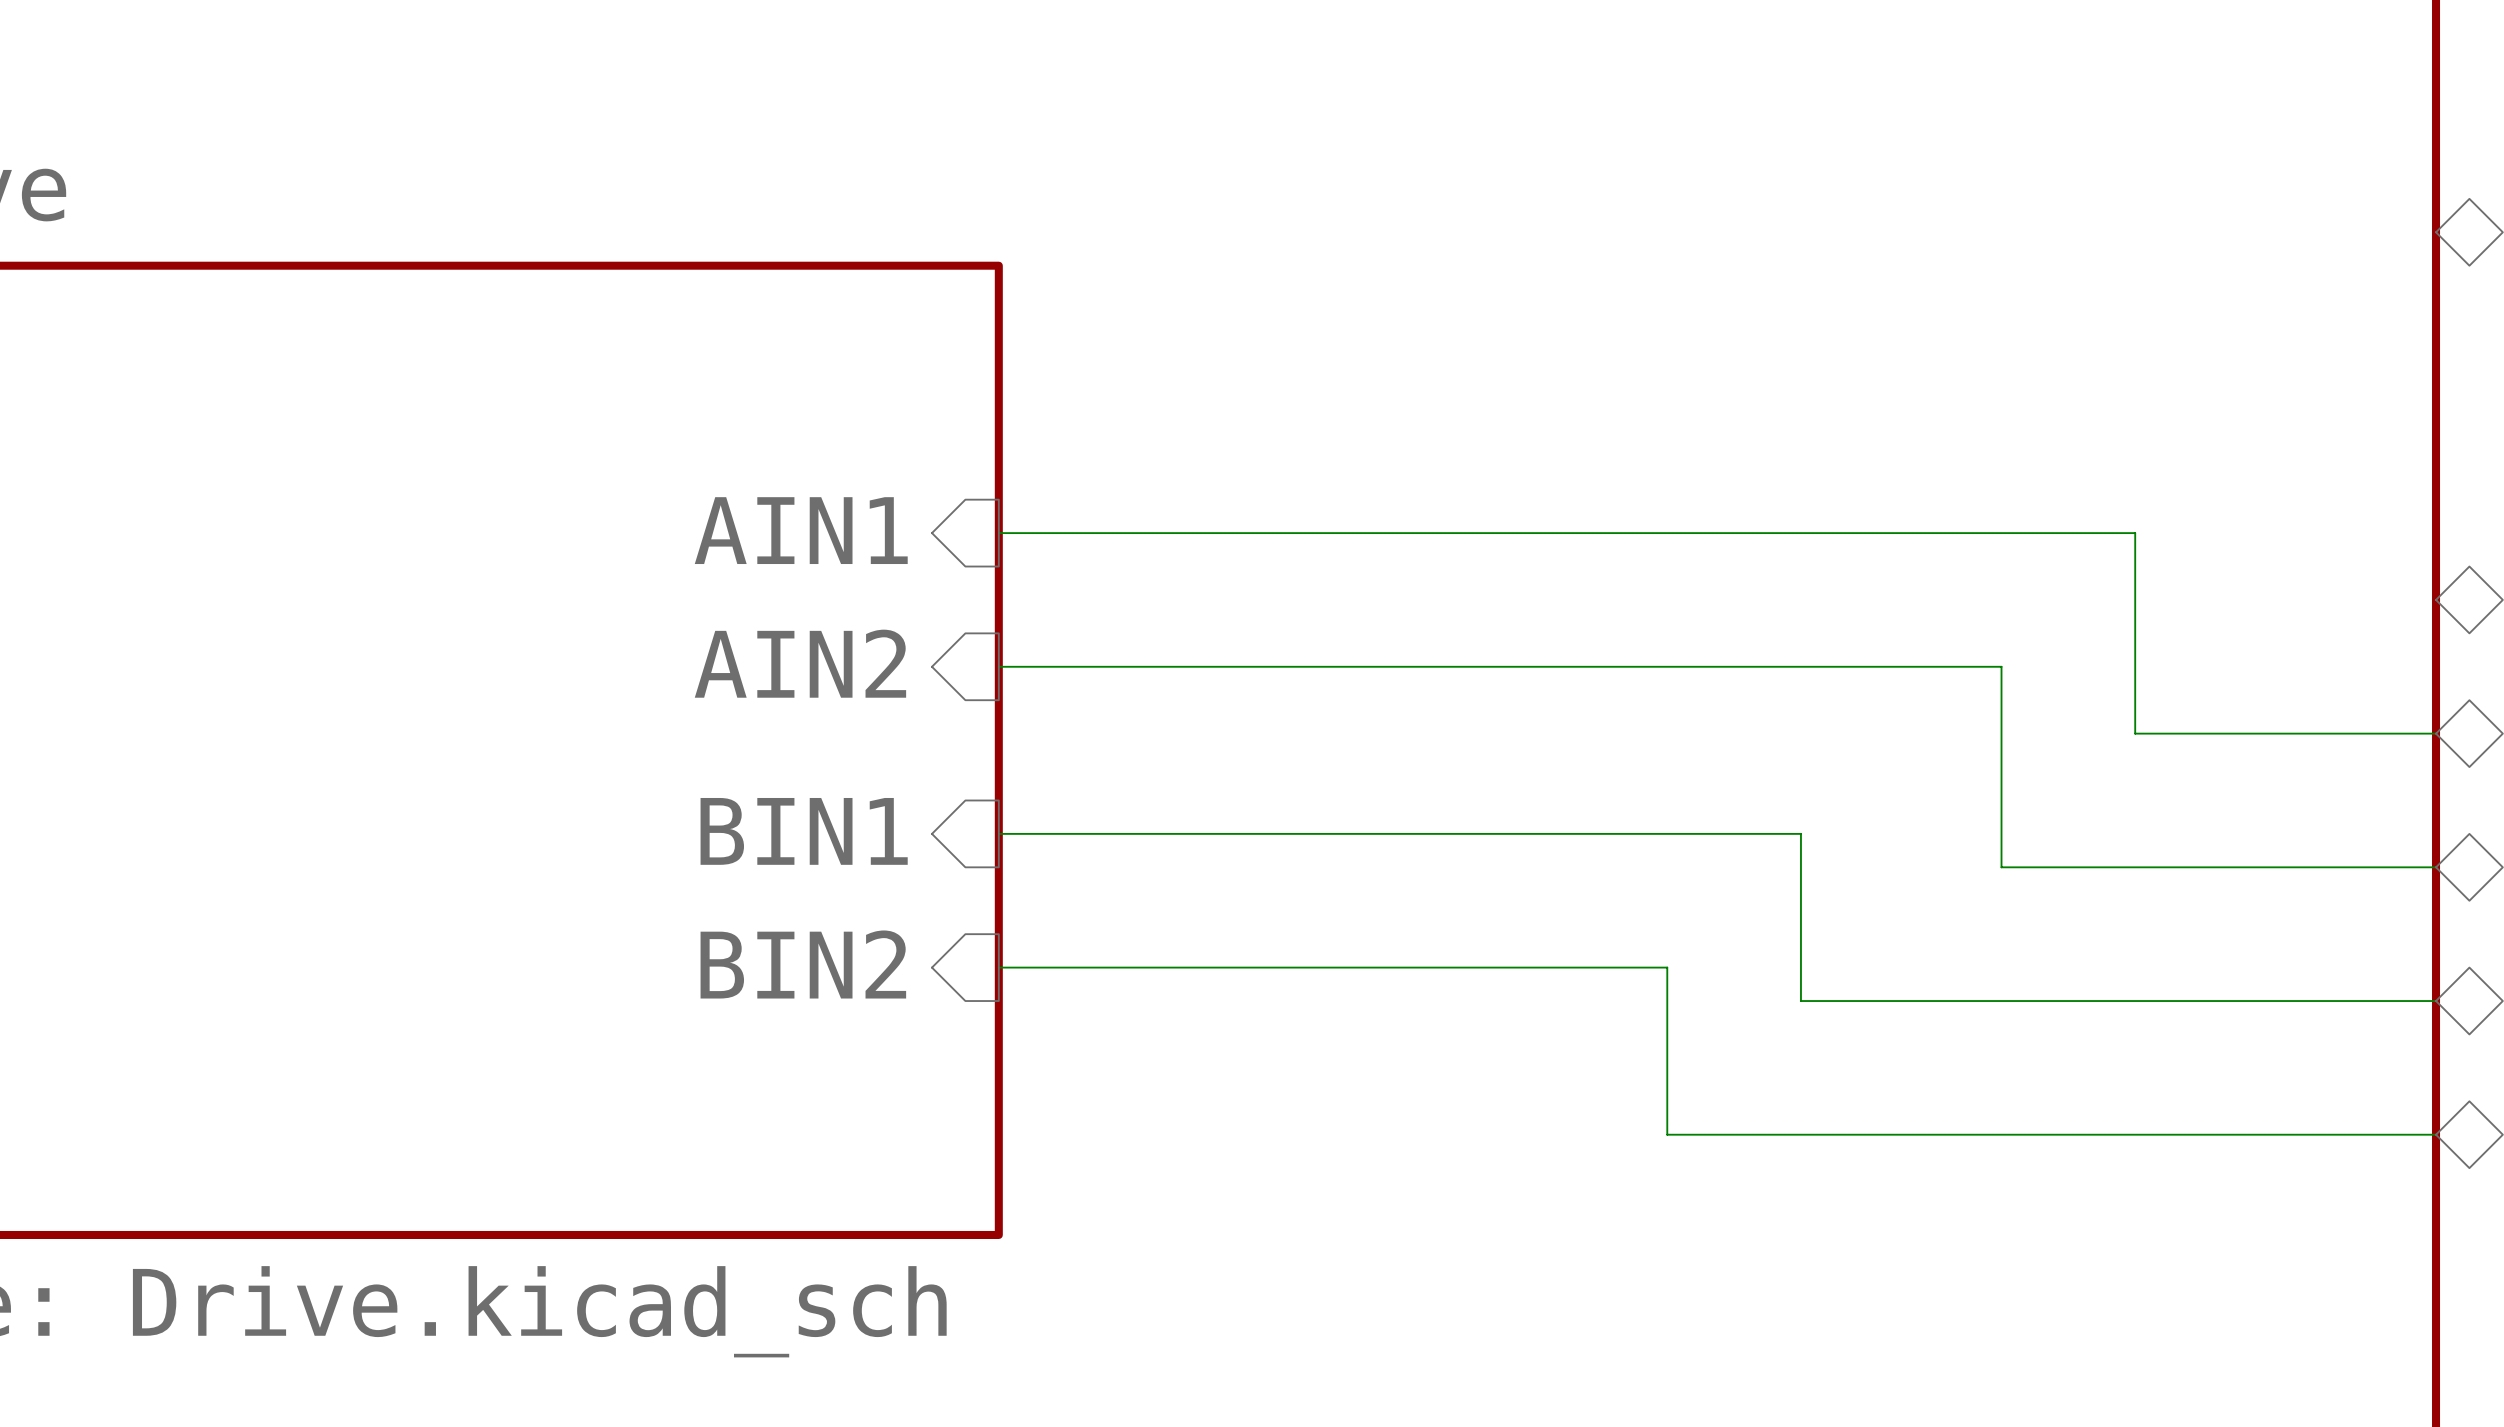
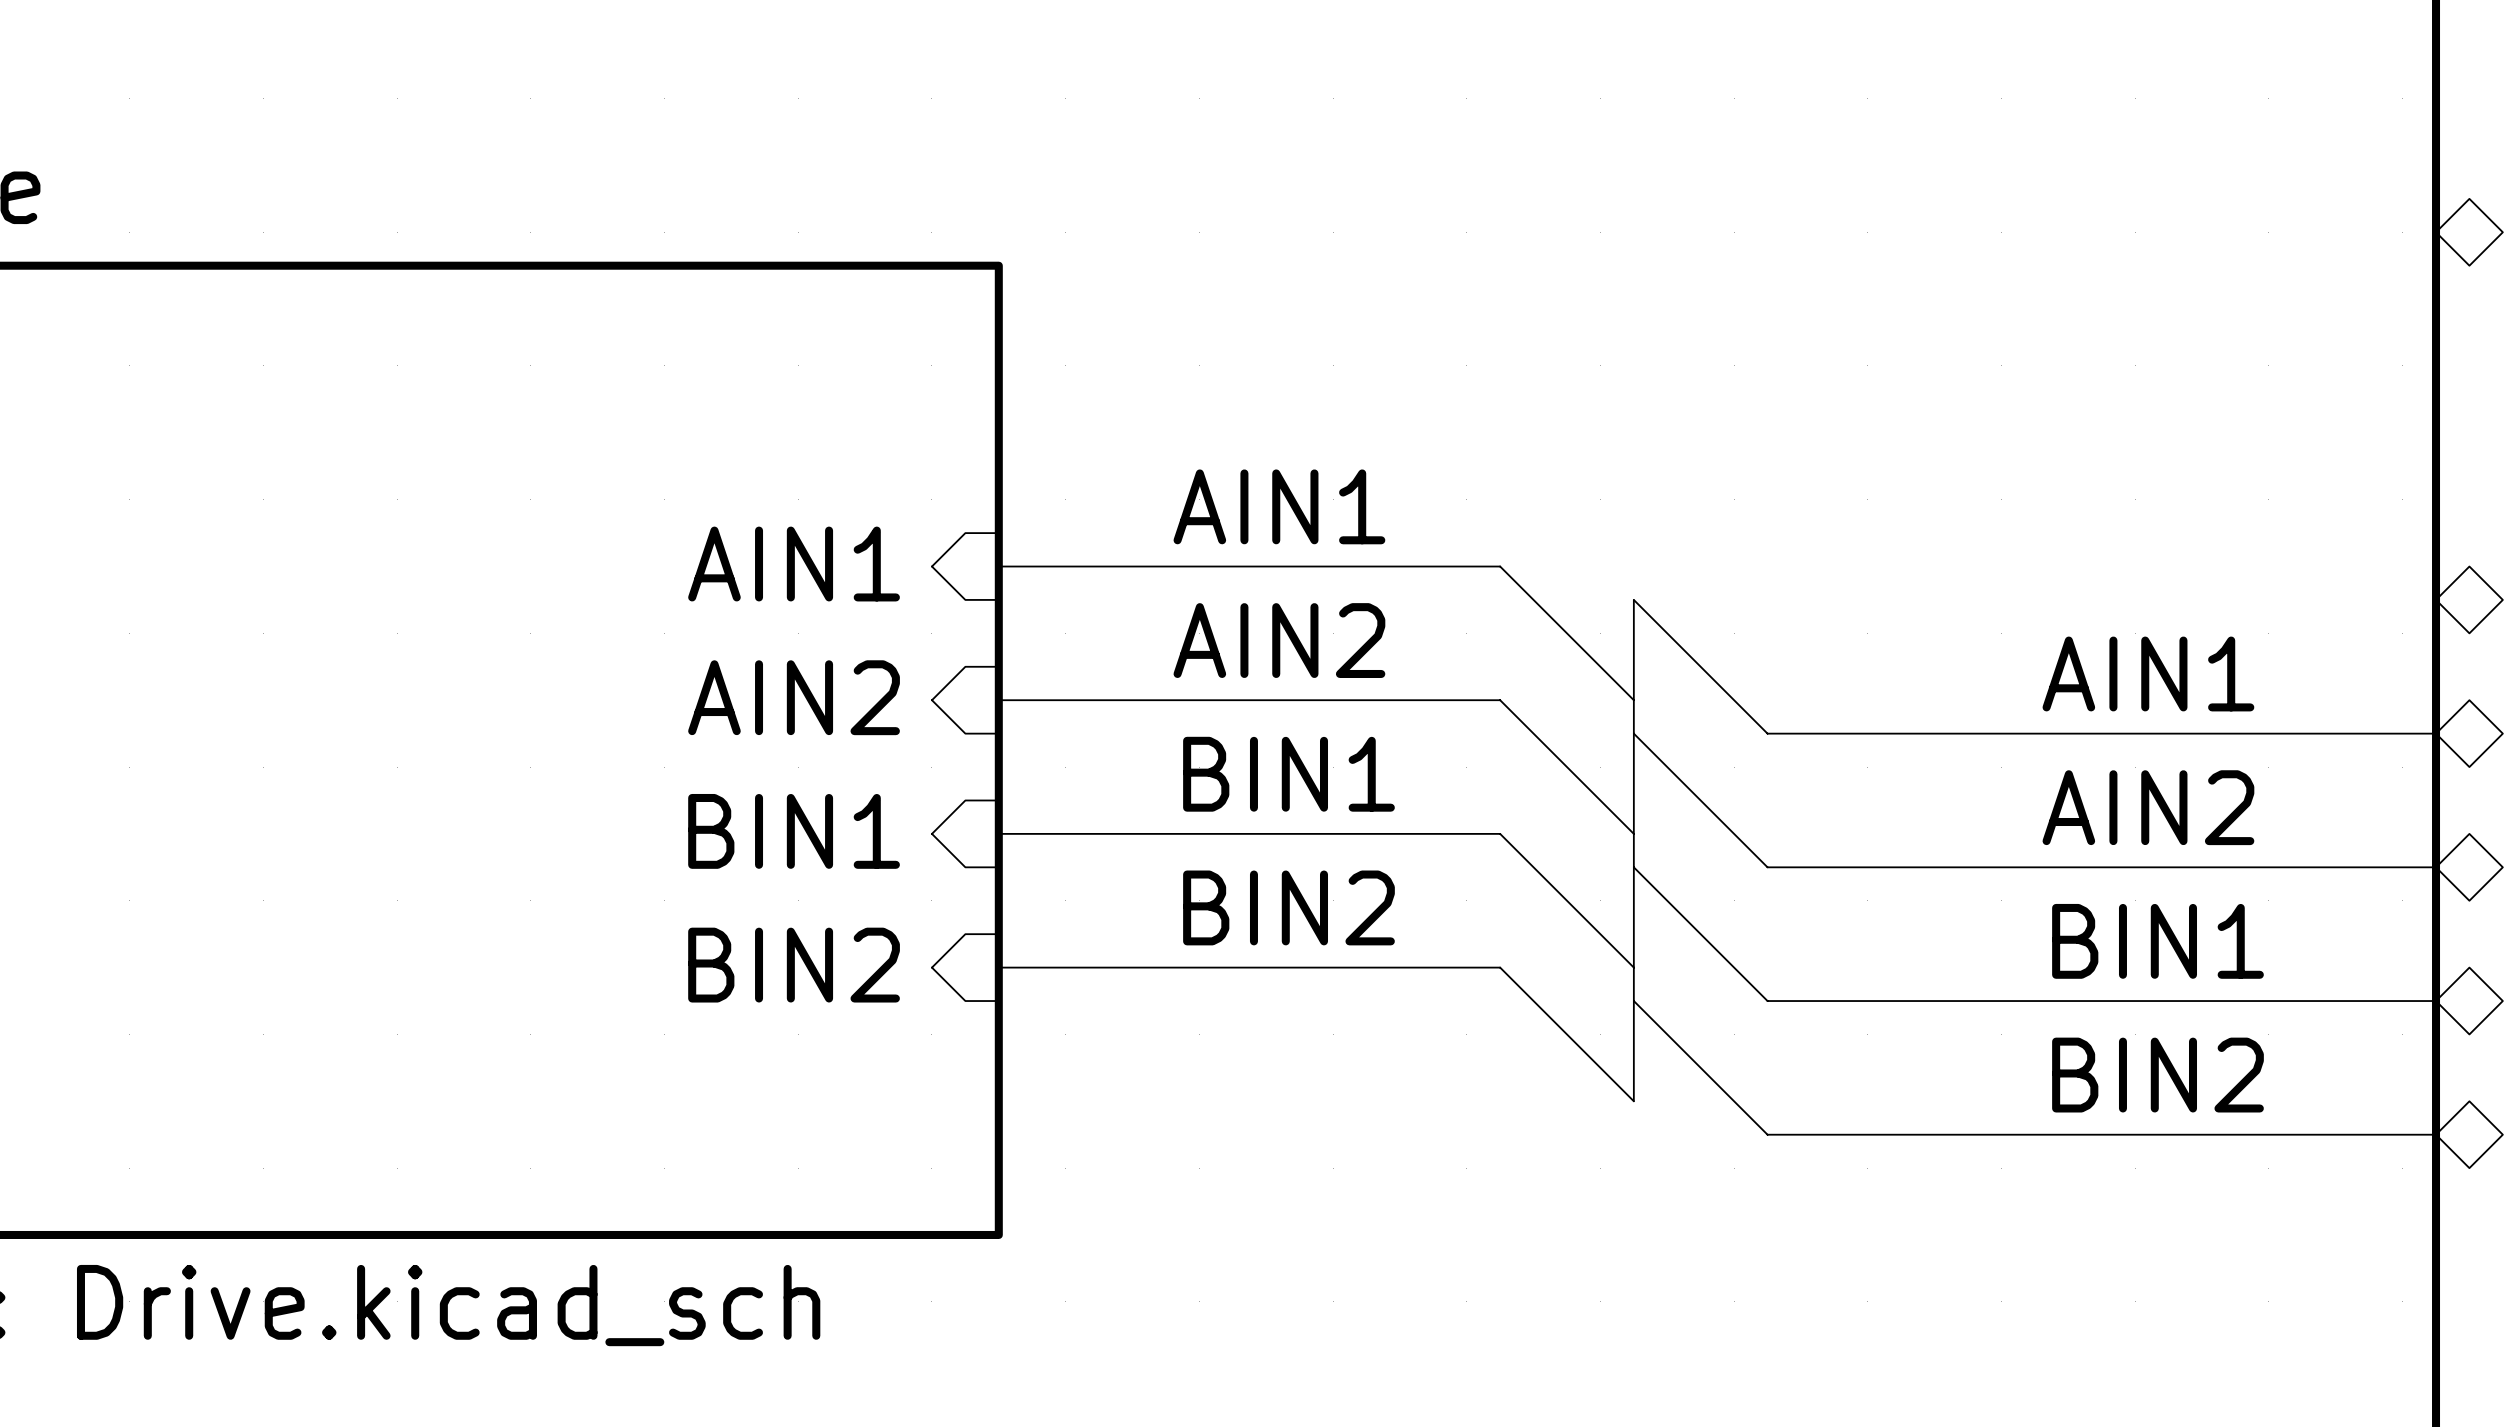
label: none -> AIN1 (1279, 506)
sheet pin position: AIN1 (801, 530) -> AIN1 (794, 564)
wire: (998, 533) (2135, 533) (2135, 733) -> (1767, 733) (2135, 733)
wire: none -> (998, 566) (1500, 566) (1633, 700)
wire: none -> (1633, 599) (1767, 733)
bus: none -> (1633, 599) (1633, 1101)
label: none -> AIN2 (1279, 640)
sheet pin position: AIN2 (800, 663) -> AIN2 (794, 697)
wire: (998, 666) (2001, 666) (2001, 867) -> (1767, 867) (2001, 867)
label: none -> AIN1 (2148, 673)
wire: none -> (998, 700) (1500, 700) (1633, 833)
wire: none -> (1633, 733) (1767, 867)
label: none -> BIN1 (1288, 774)
label: none -> AIN2 (2148, 807)
wire: (1500, 833) (1800, 833) (1800, 1001) -> (1500, 833) (1633, 967)
wire: none -> (1633, 867) (1767, 1001)
label: none -> BIN2 (1288, 907)
label: none -> BIN1 (2157, 941)
wire: (1500, 967) (1667, 967) (1667, 1134) (1767, 1134) -> (1500, 967) (1633, 1101)
wire: none -> (1633, 1001) (1767, 1134)
wire: none -> (1767, 1001) (1800, 1001)
label: none -> BIN2 (2157, 1075)

